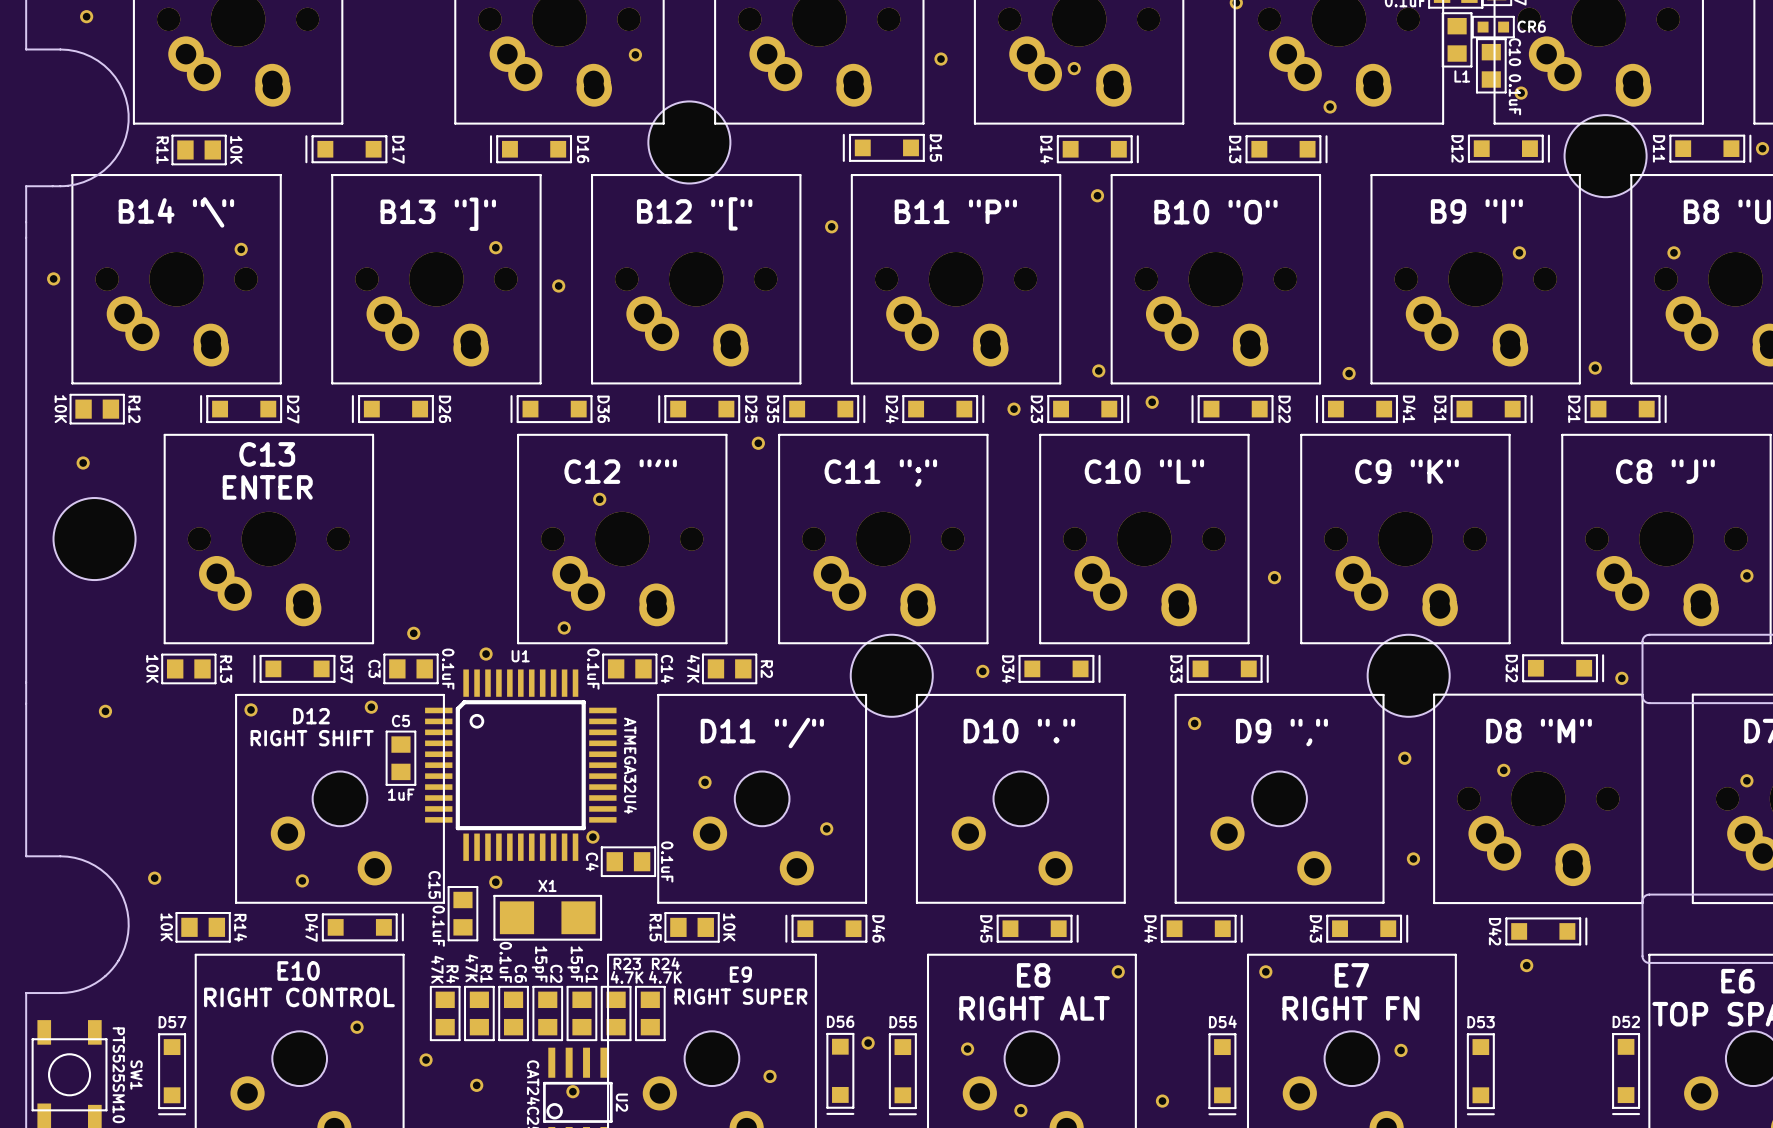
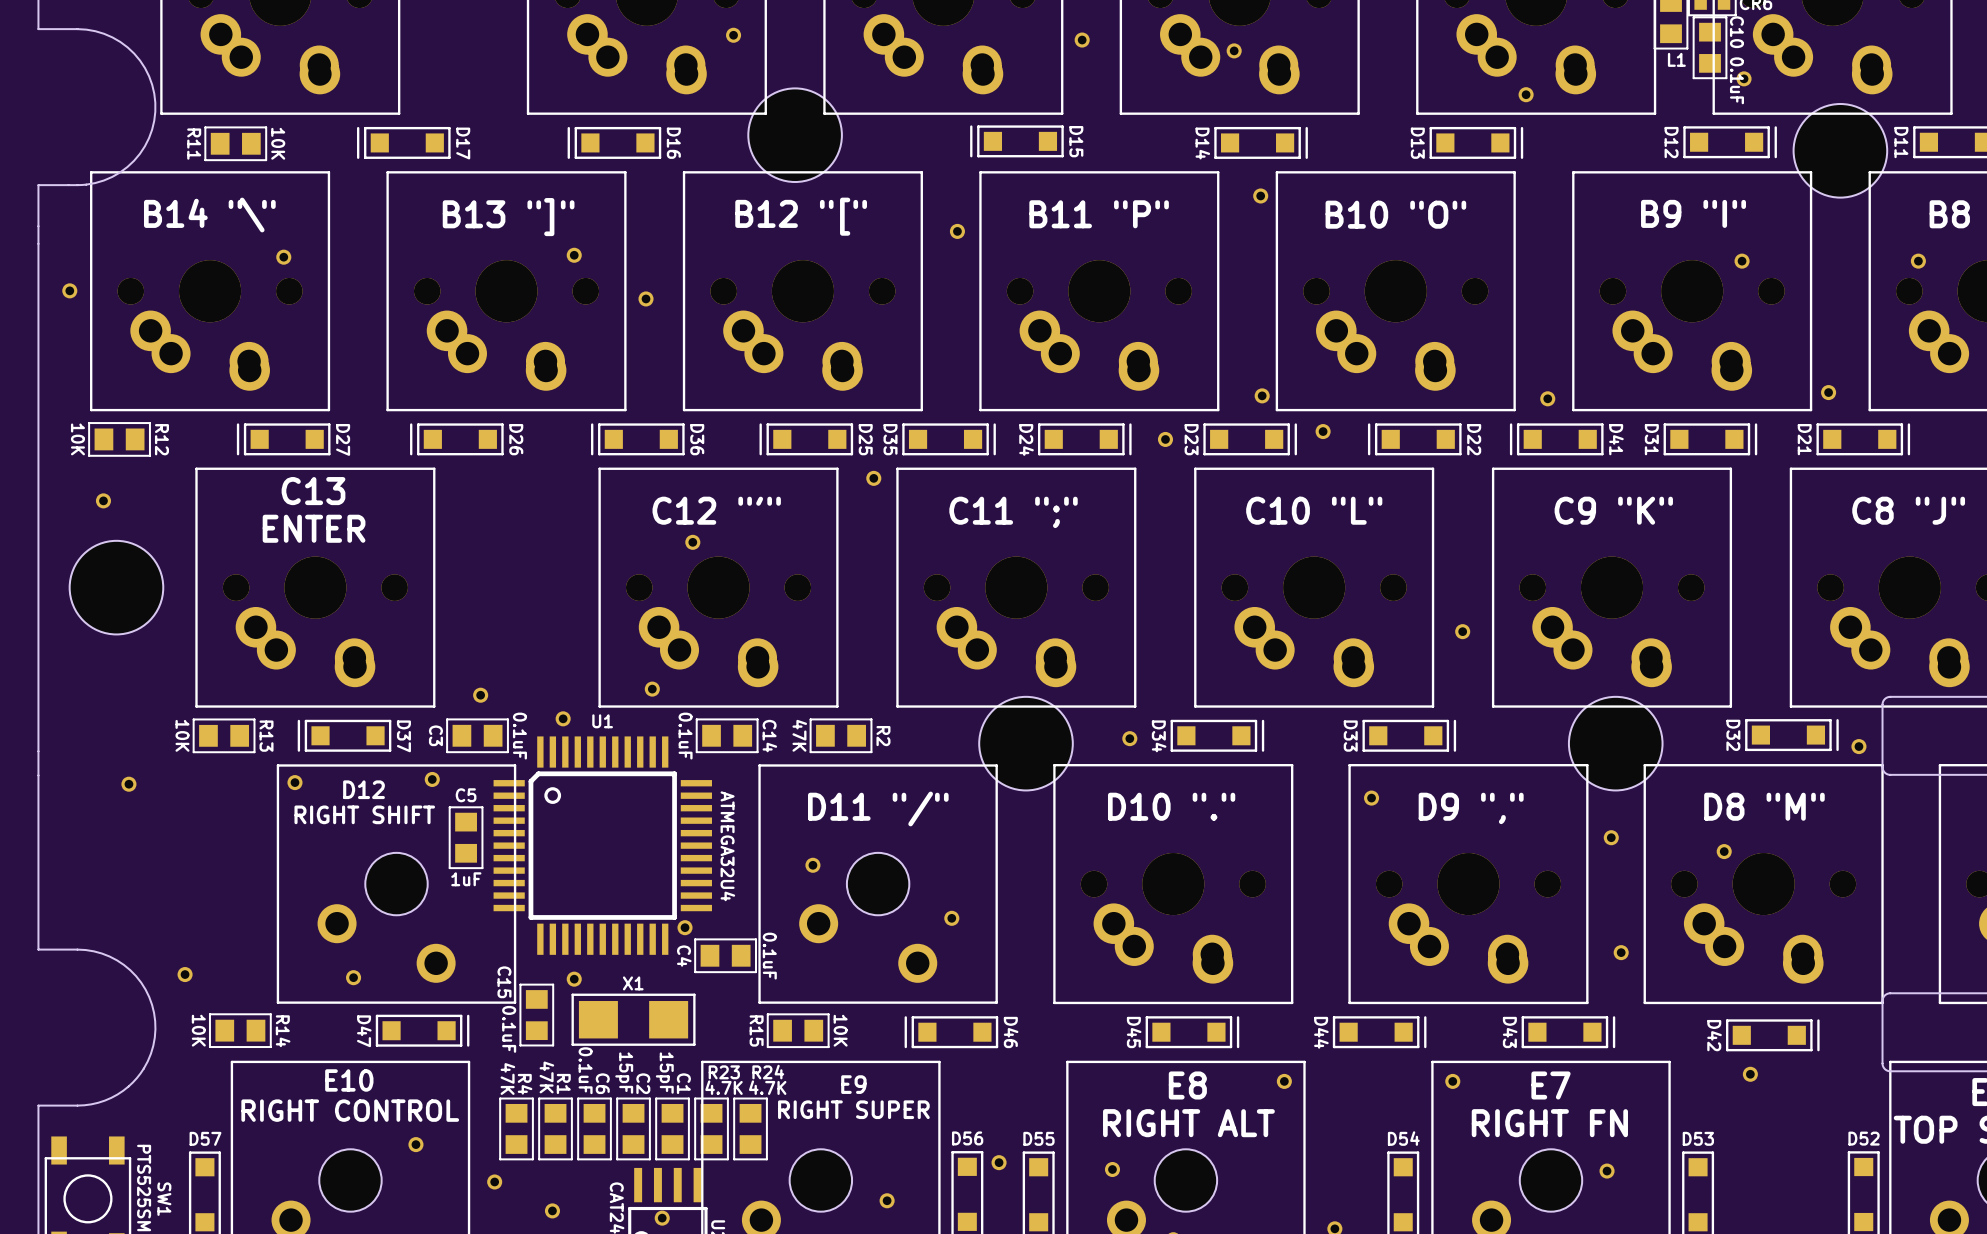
part footprint: [915, 693, 1126, 904] -> [1053, 764, 1294, 1005]
part footprint: [1174, 693, 1385, 904] -> [1348, 764, 1589, 1005]

